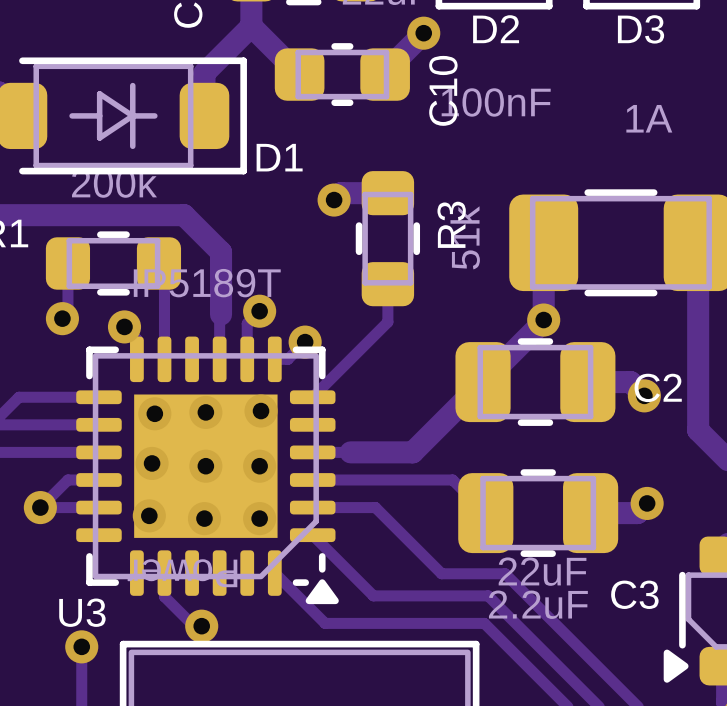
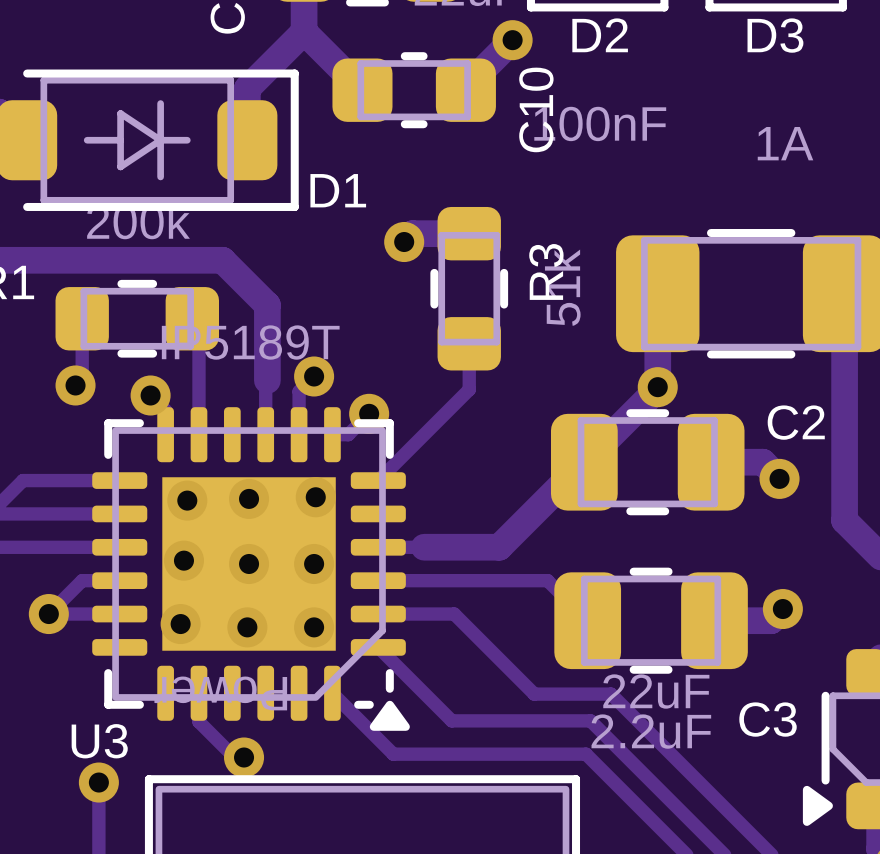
C2 name position: C2 (658, 387) -> C2 (796, 422)

